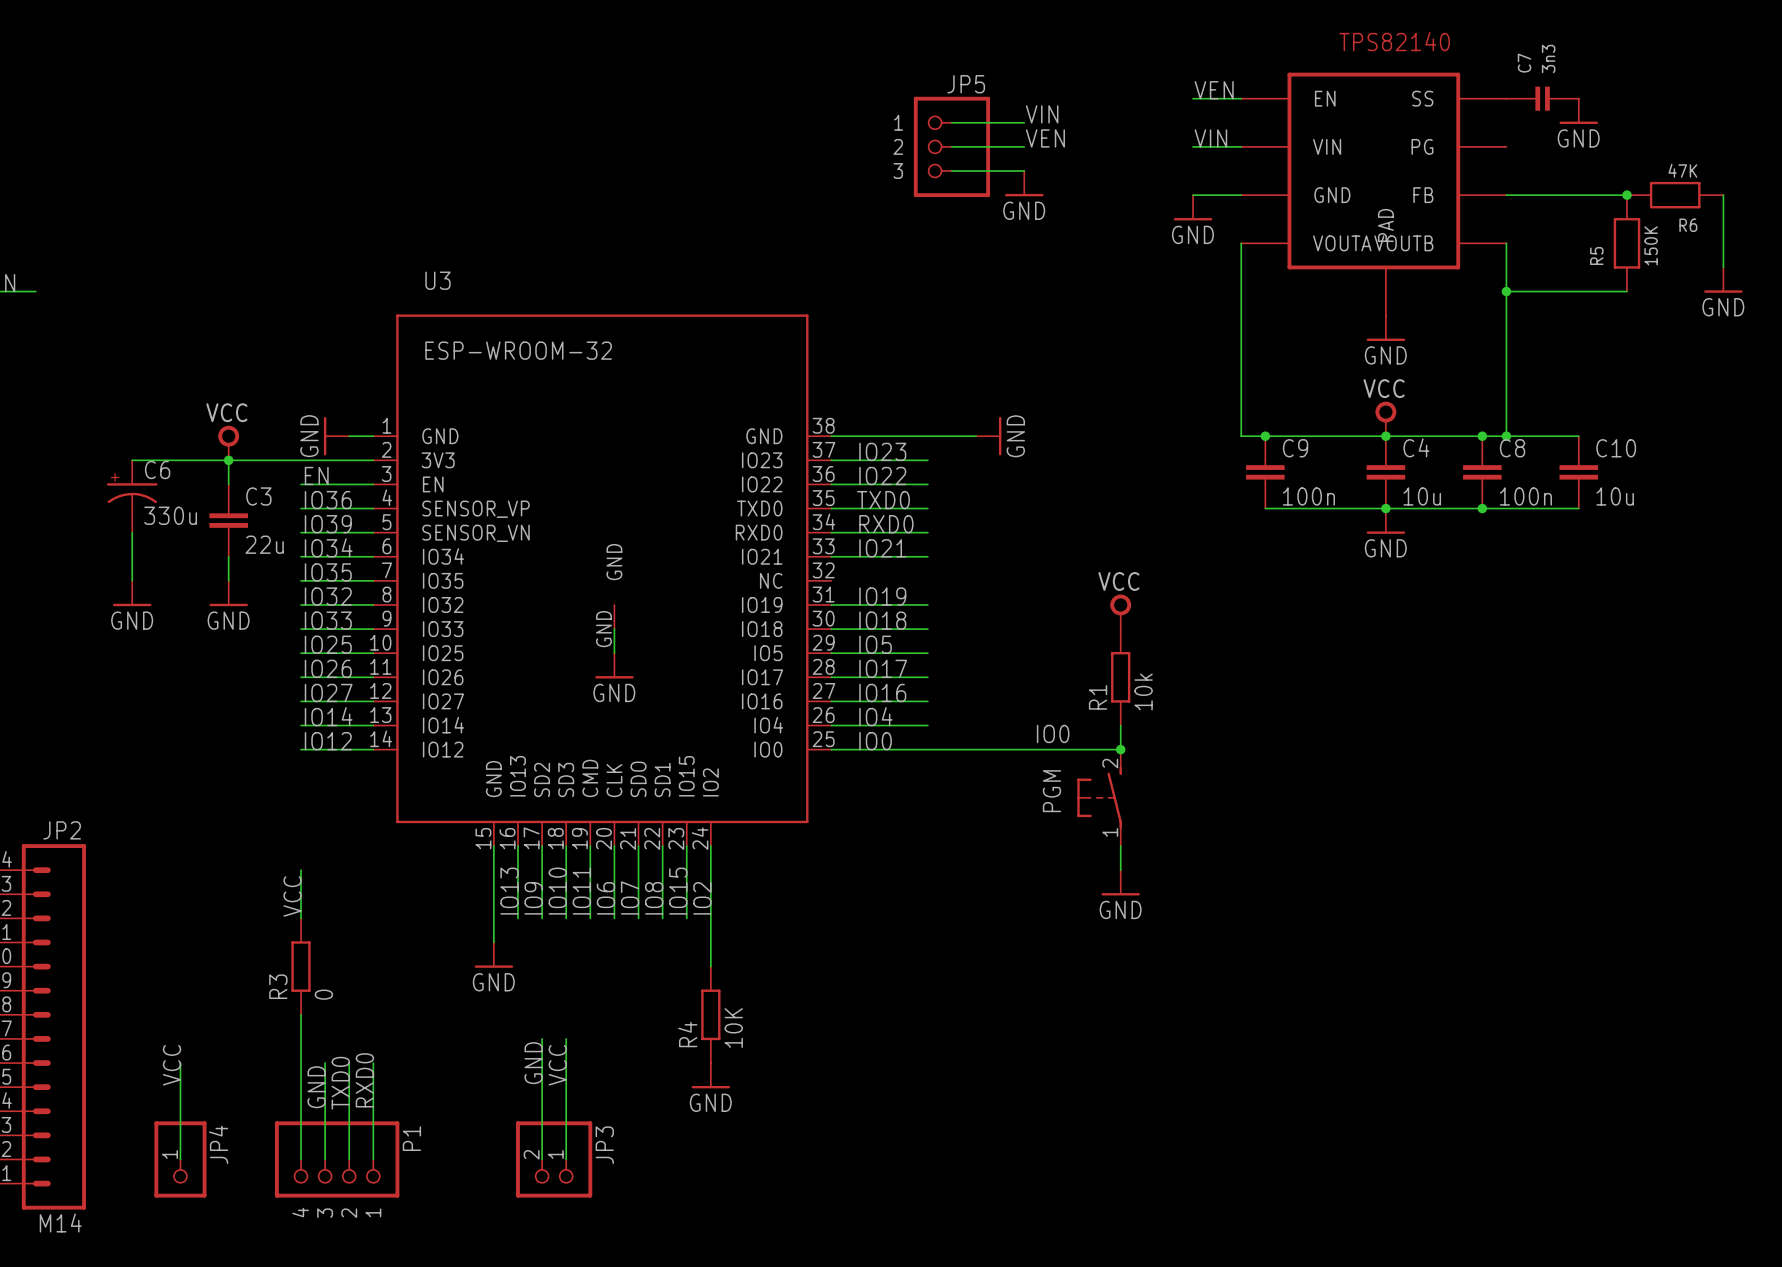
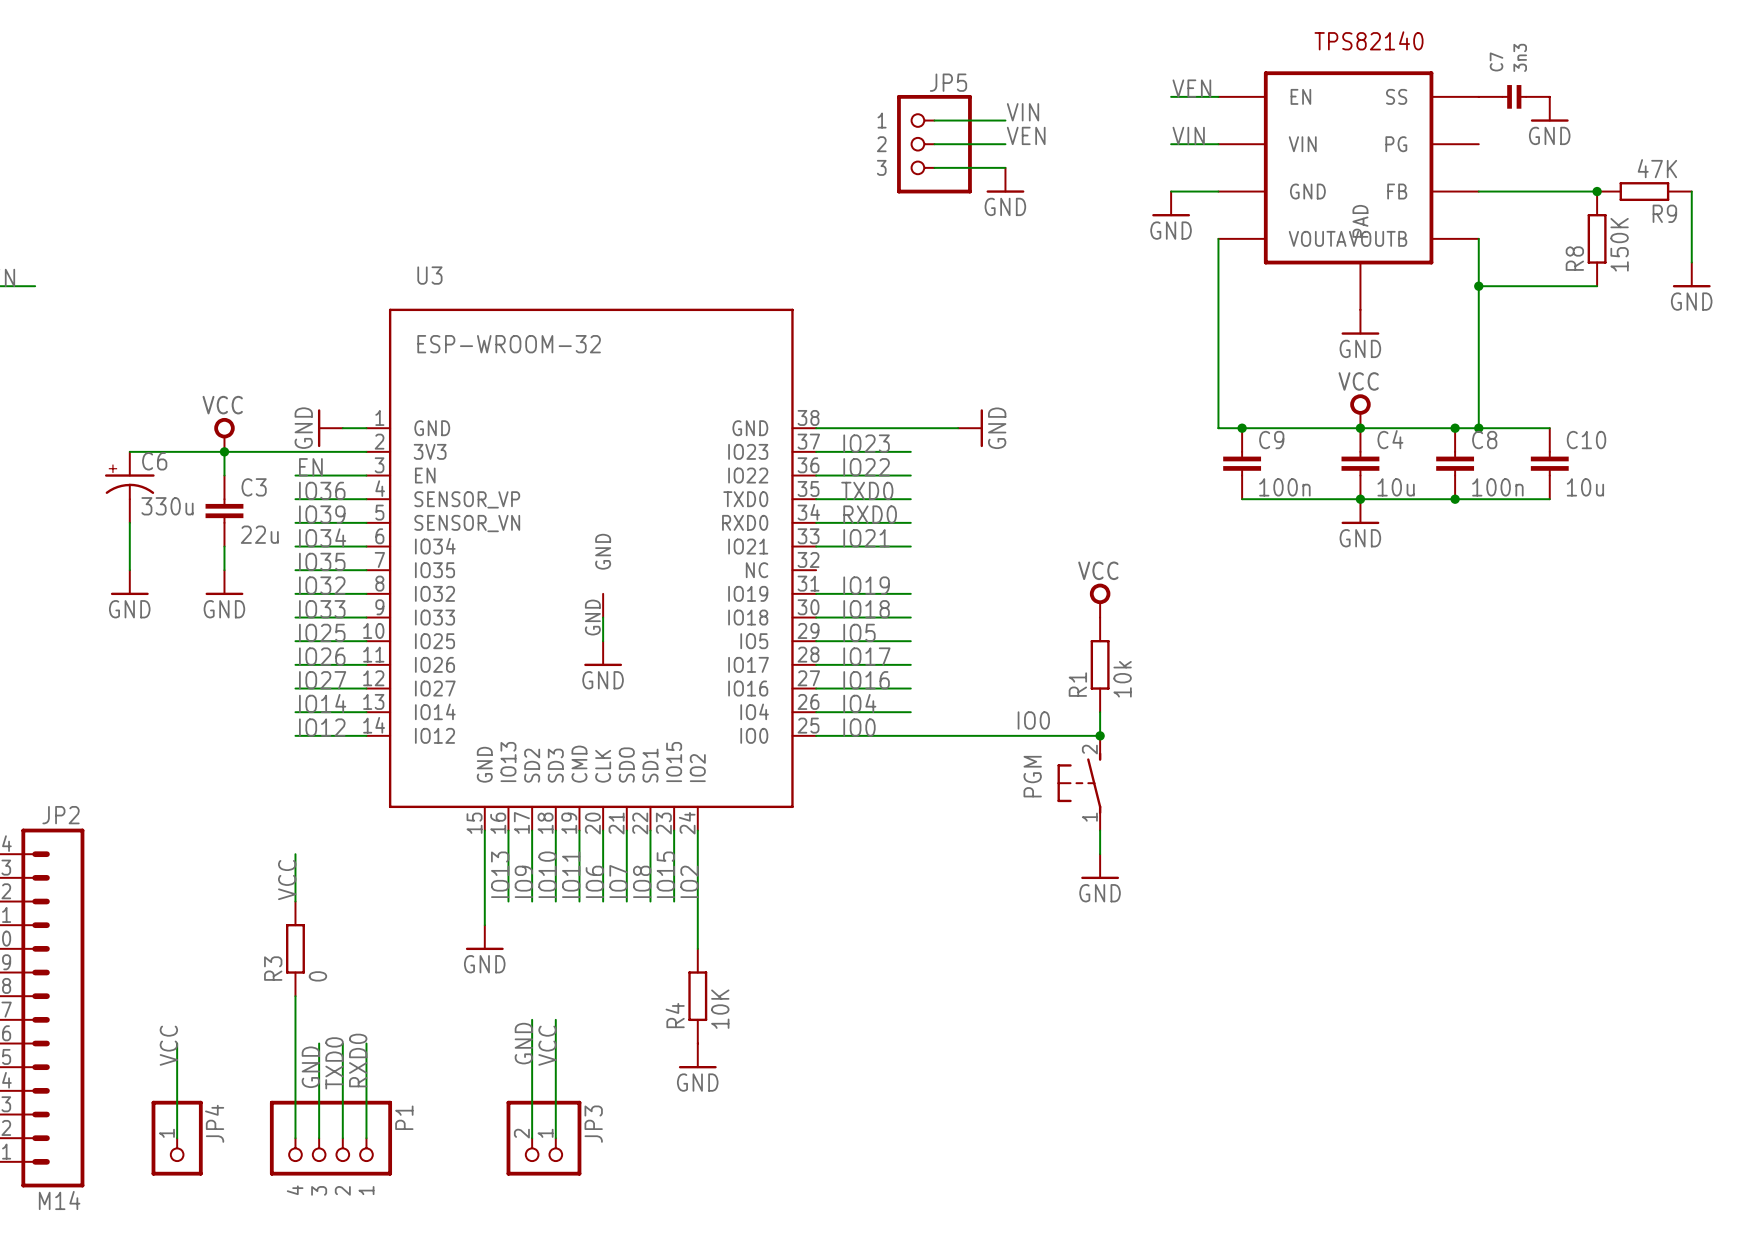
R6: 47K (1675, 195) -> none
R9: none -> 47K (1644, 191)
R5: 150K (1626, 243) -> none
R8: none -> 150K (1597, 238)

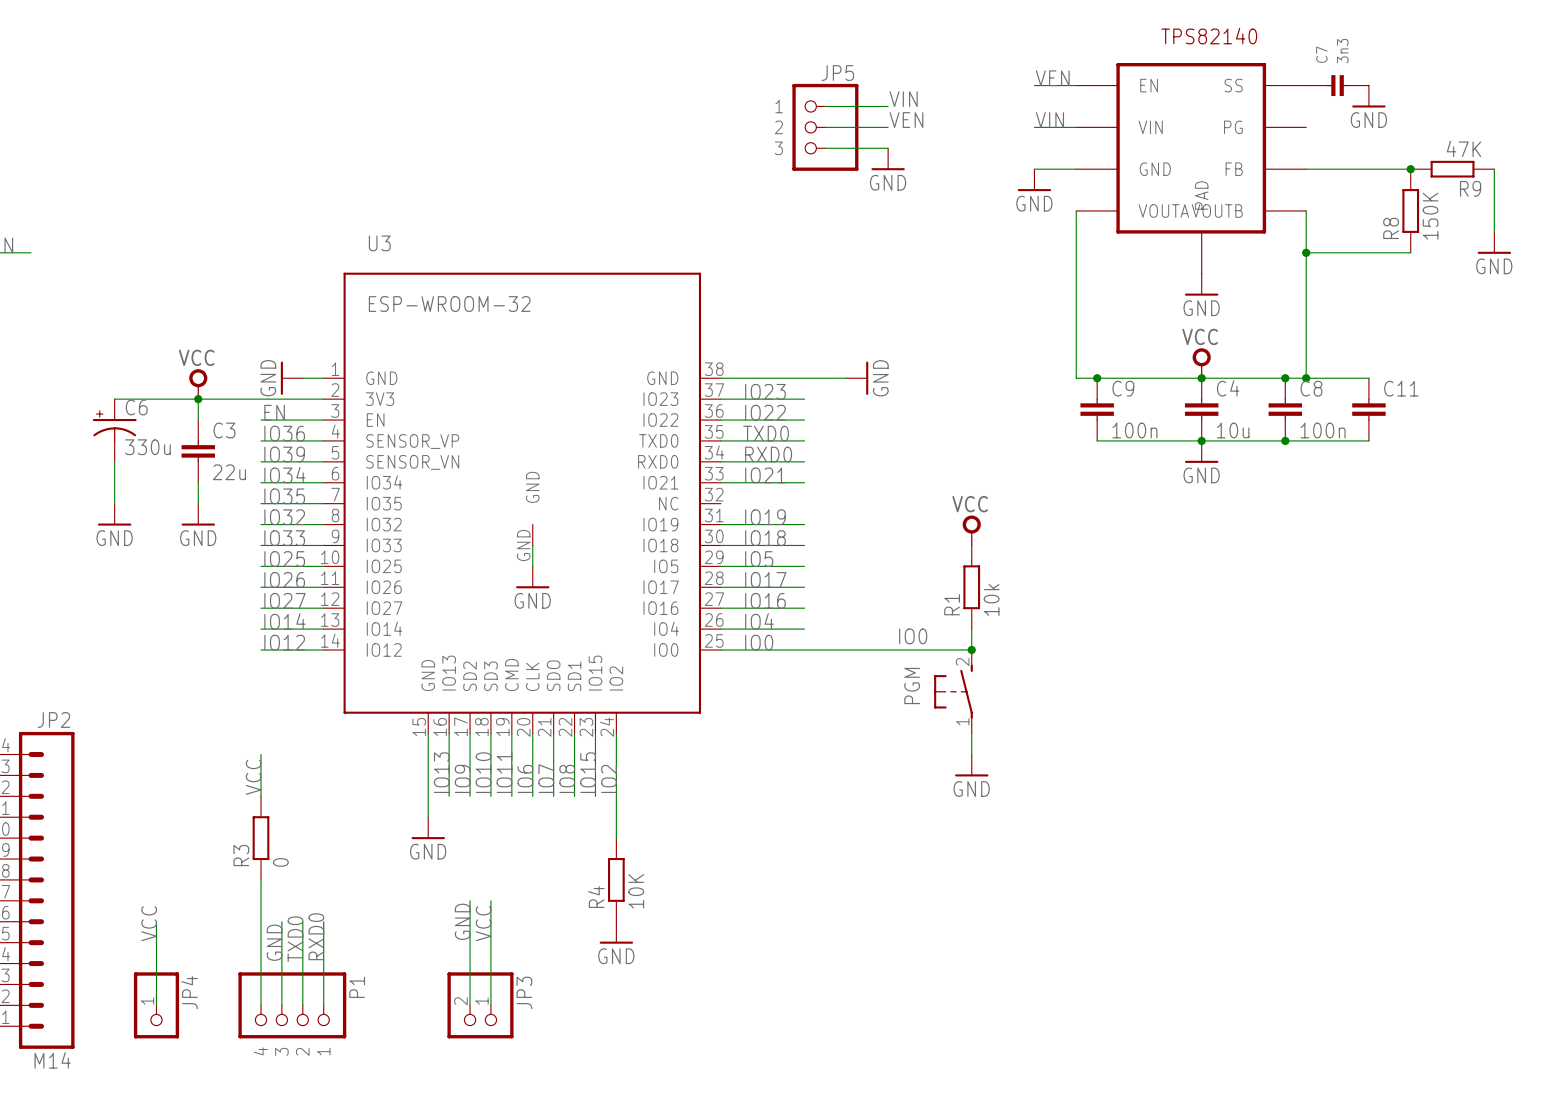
C10 name: C10 (1586, 440) -> C11 (1401, 388)
C10 value: 10u (1585, 487) -> none

